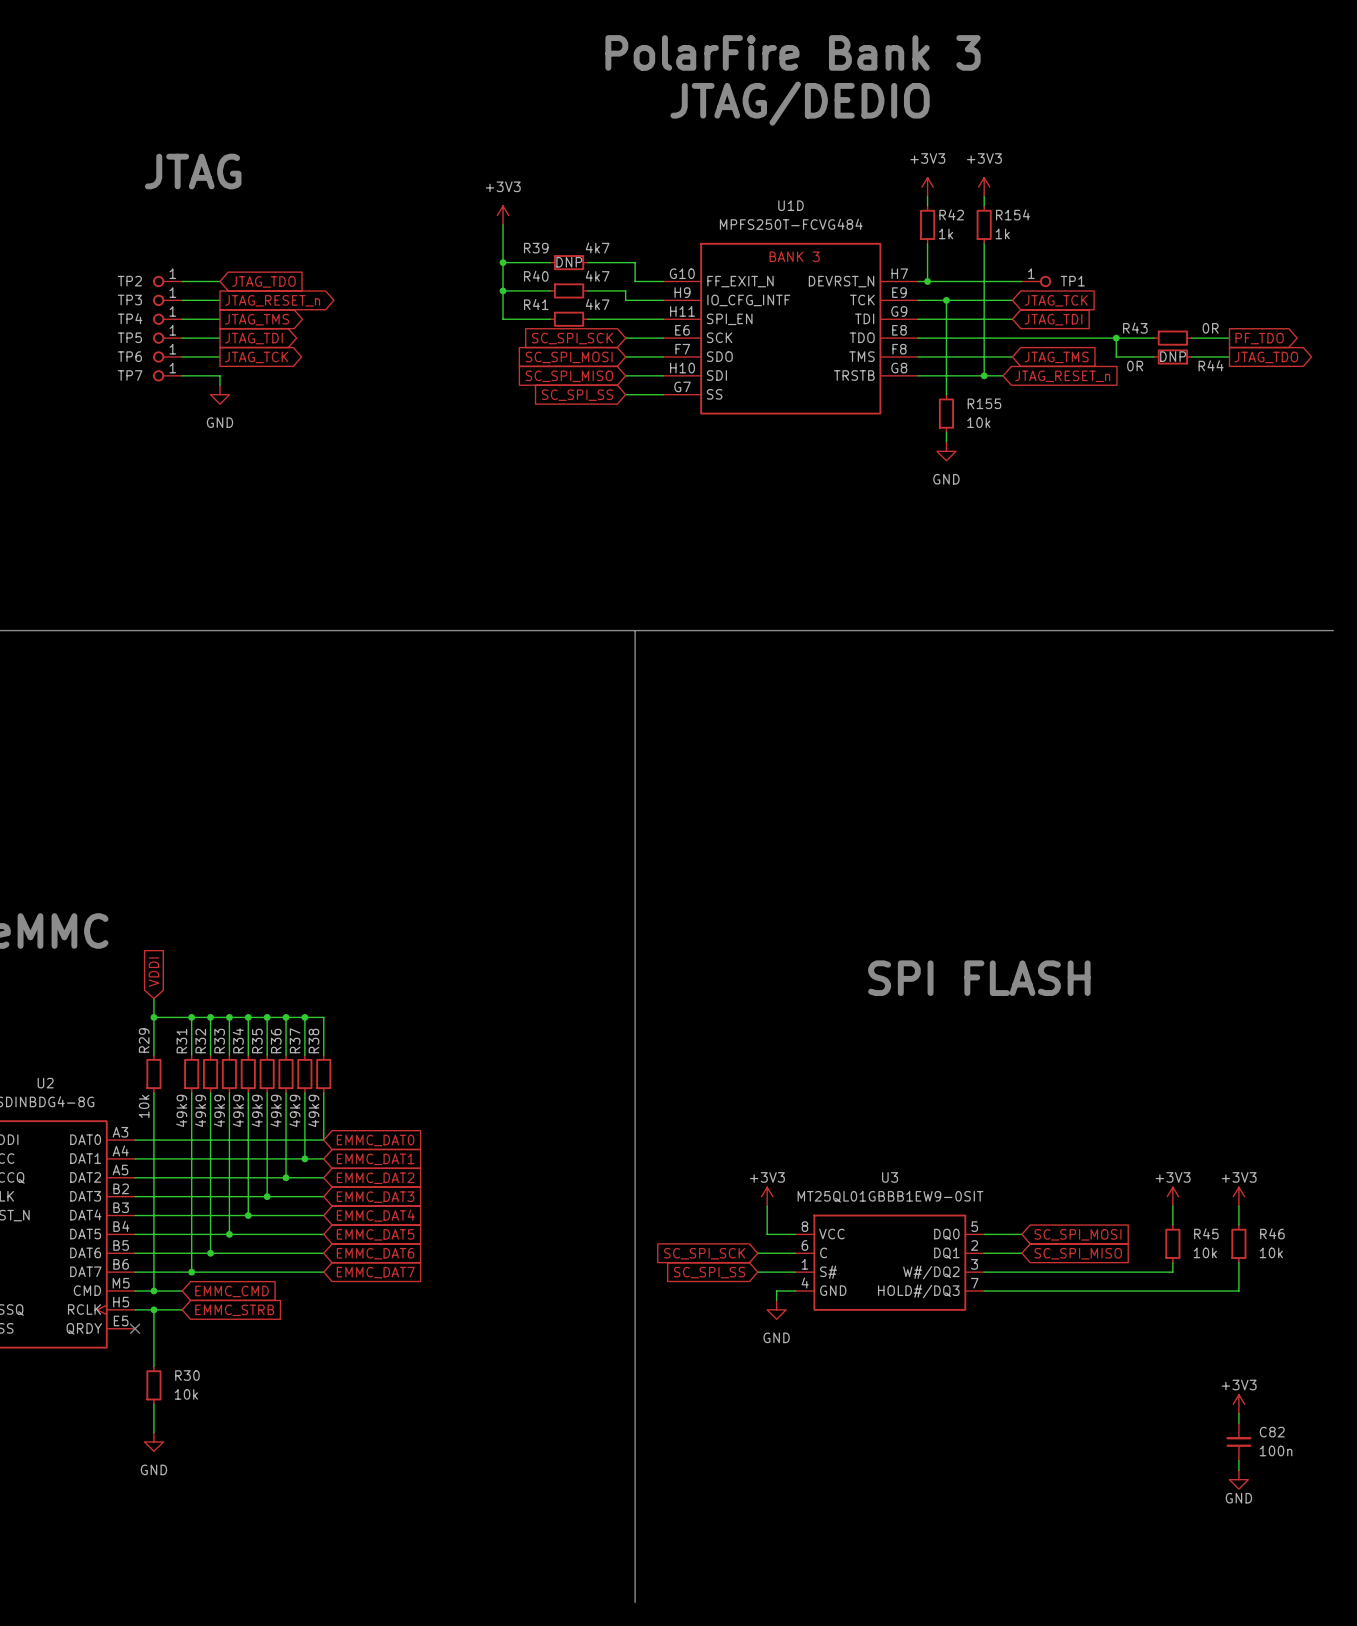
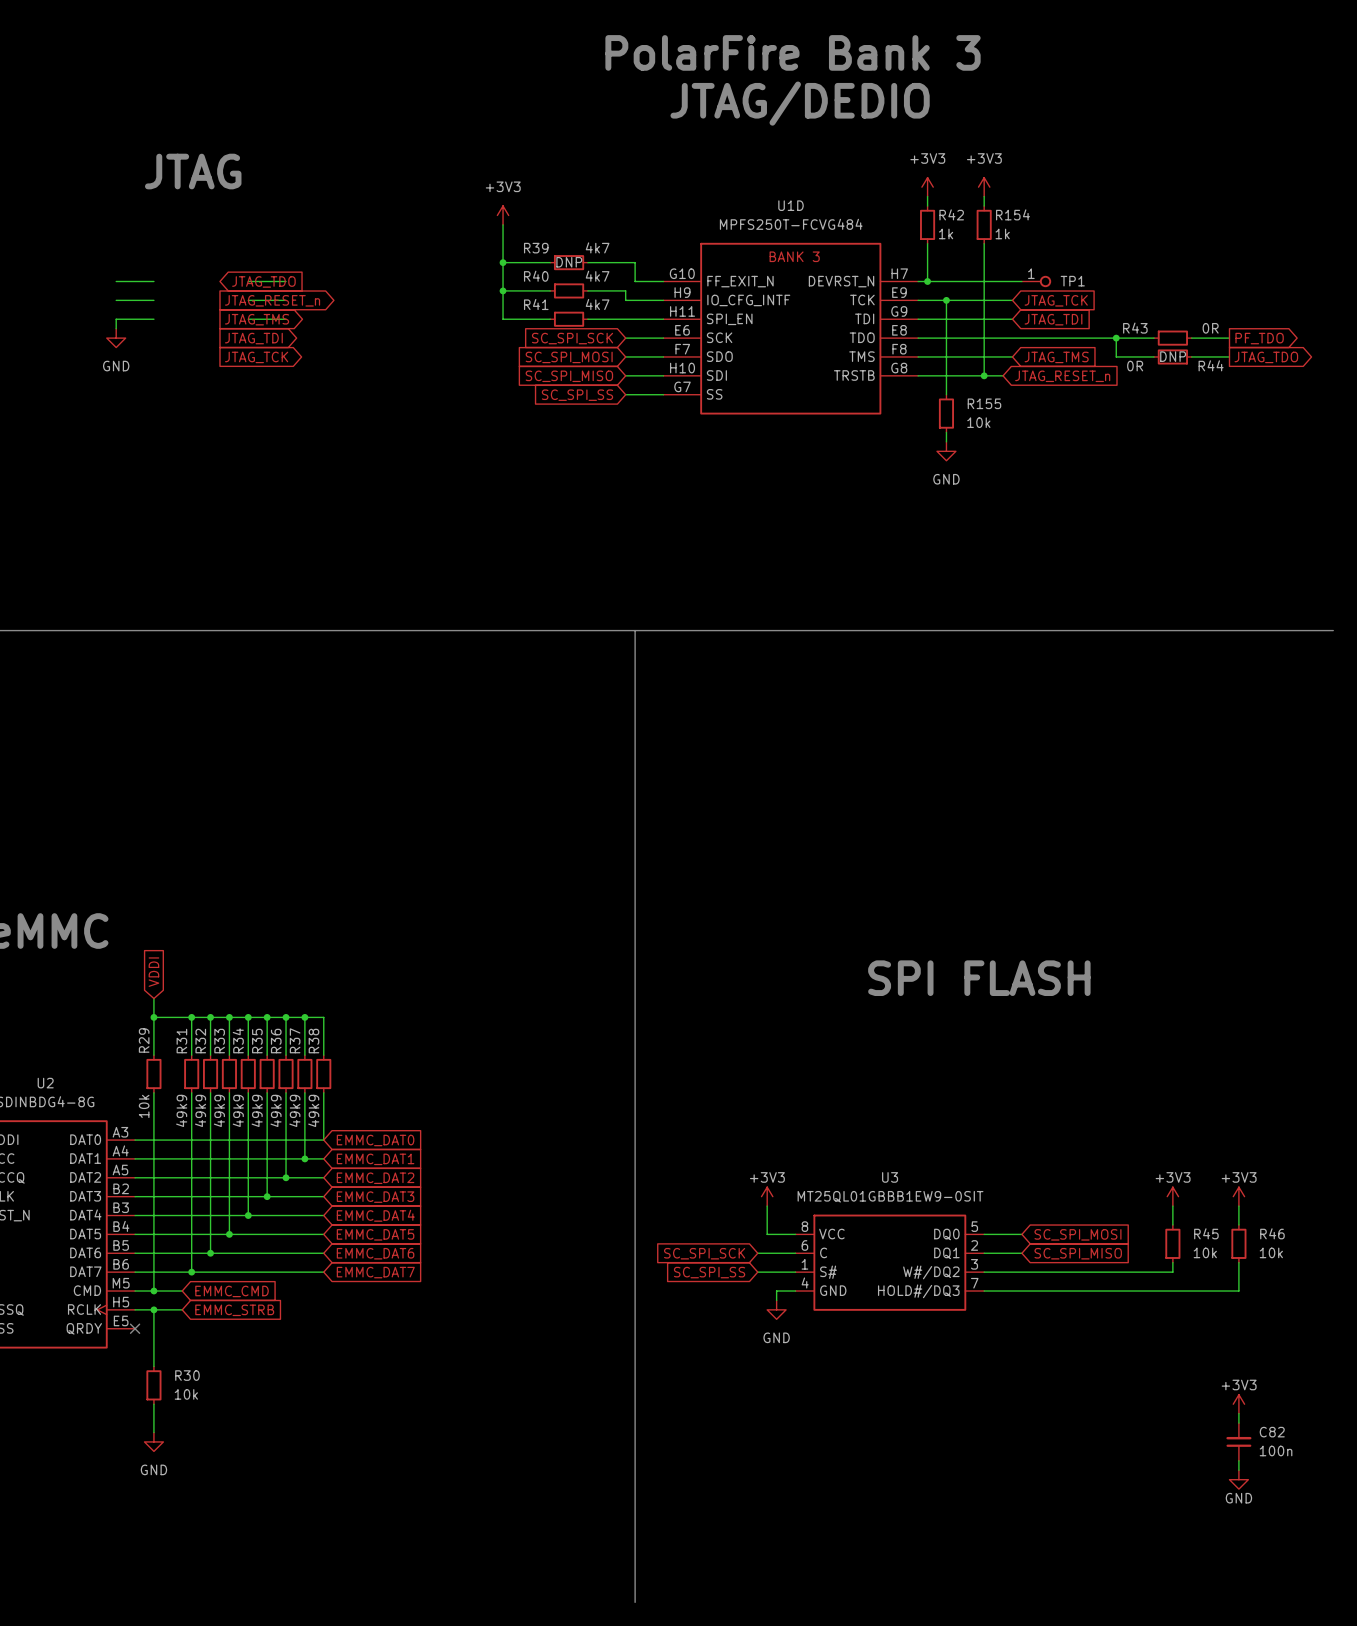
TP2: (167, 281) -> none
wire: (182, 281) (219, 281) -> (248, 281) (286, 281)
TP3: (167, 300) -> none
wire: (182, 300) (219, 300) -> (248, 300) (286, 300)
wire: none -> (153, 319) (116, 319) (116, 328)
TP4: (167, 319) -> none
wire: (182, 319) (219, 319) -> (248, 319) (286, 319)
TP5: (167, 338) -> none
wire: (182, 338) (219, 338) -> (116, 300) (153, 300)
TP6: (167, 356) -> none
wire: (182, 356) (219, 356) -> (116, 281) (153, 281)
TP7: (167, 375) -> none
wire: (182, 375) (219, 375) (219, 385) -> none
power symbol position: GND (219, 394) -> GND (116, 338)

